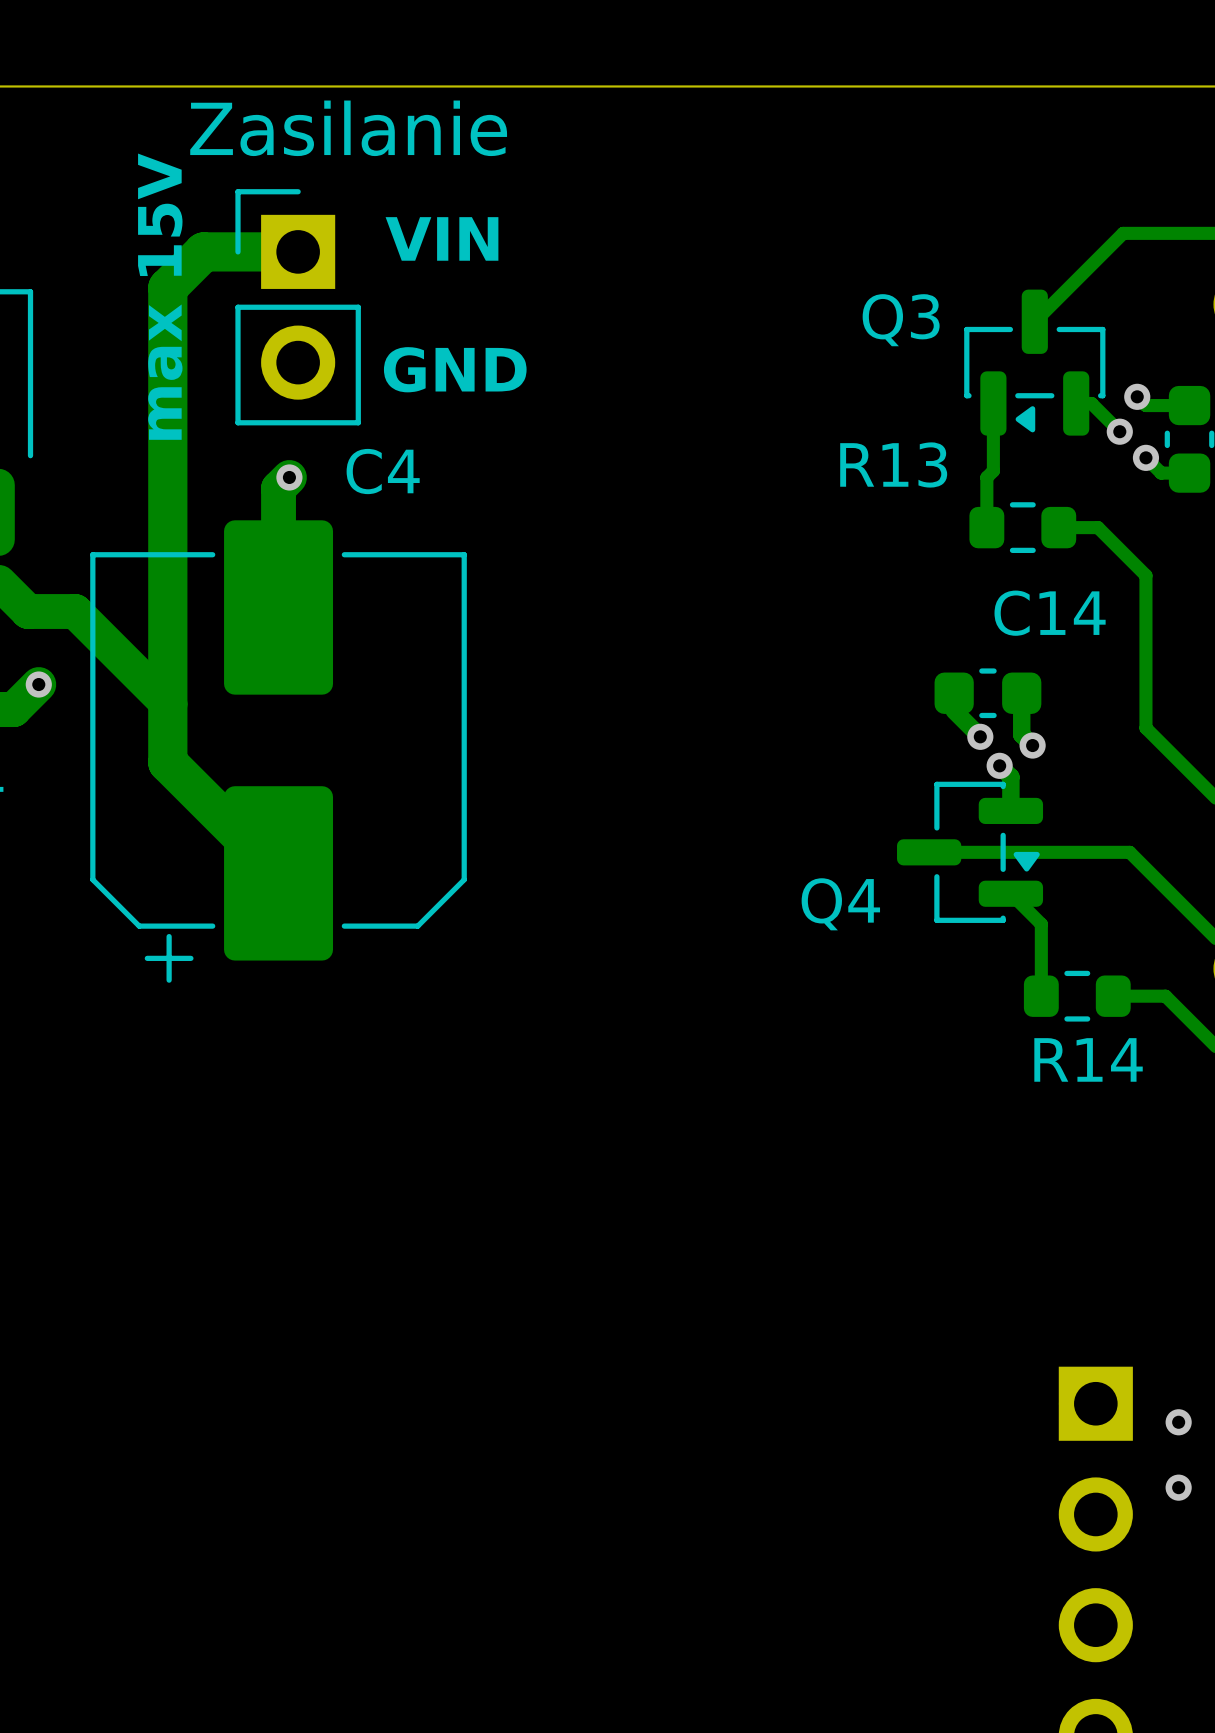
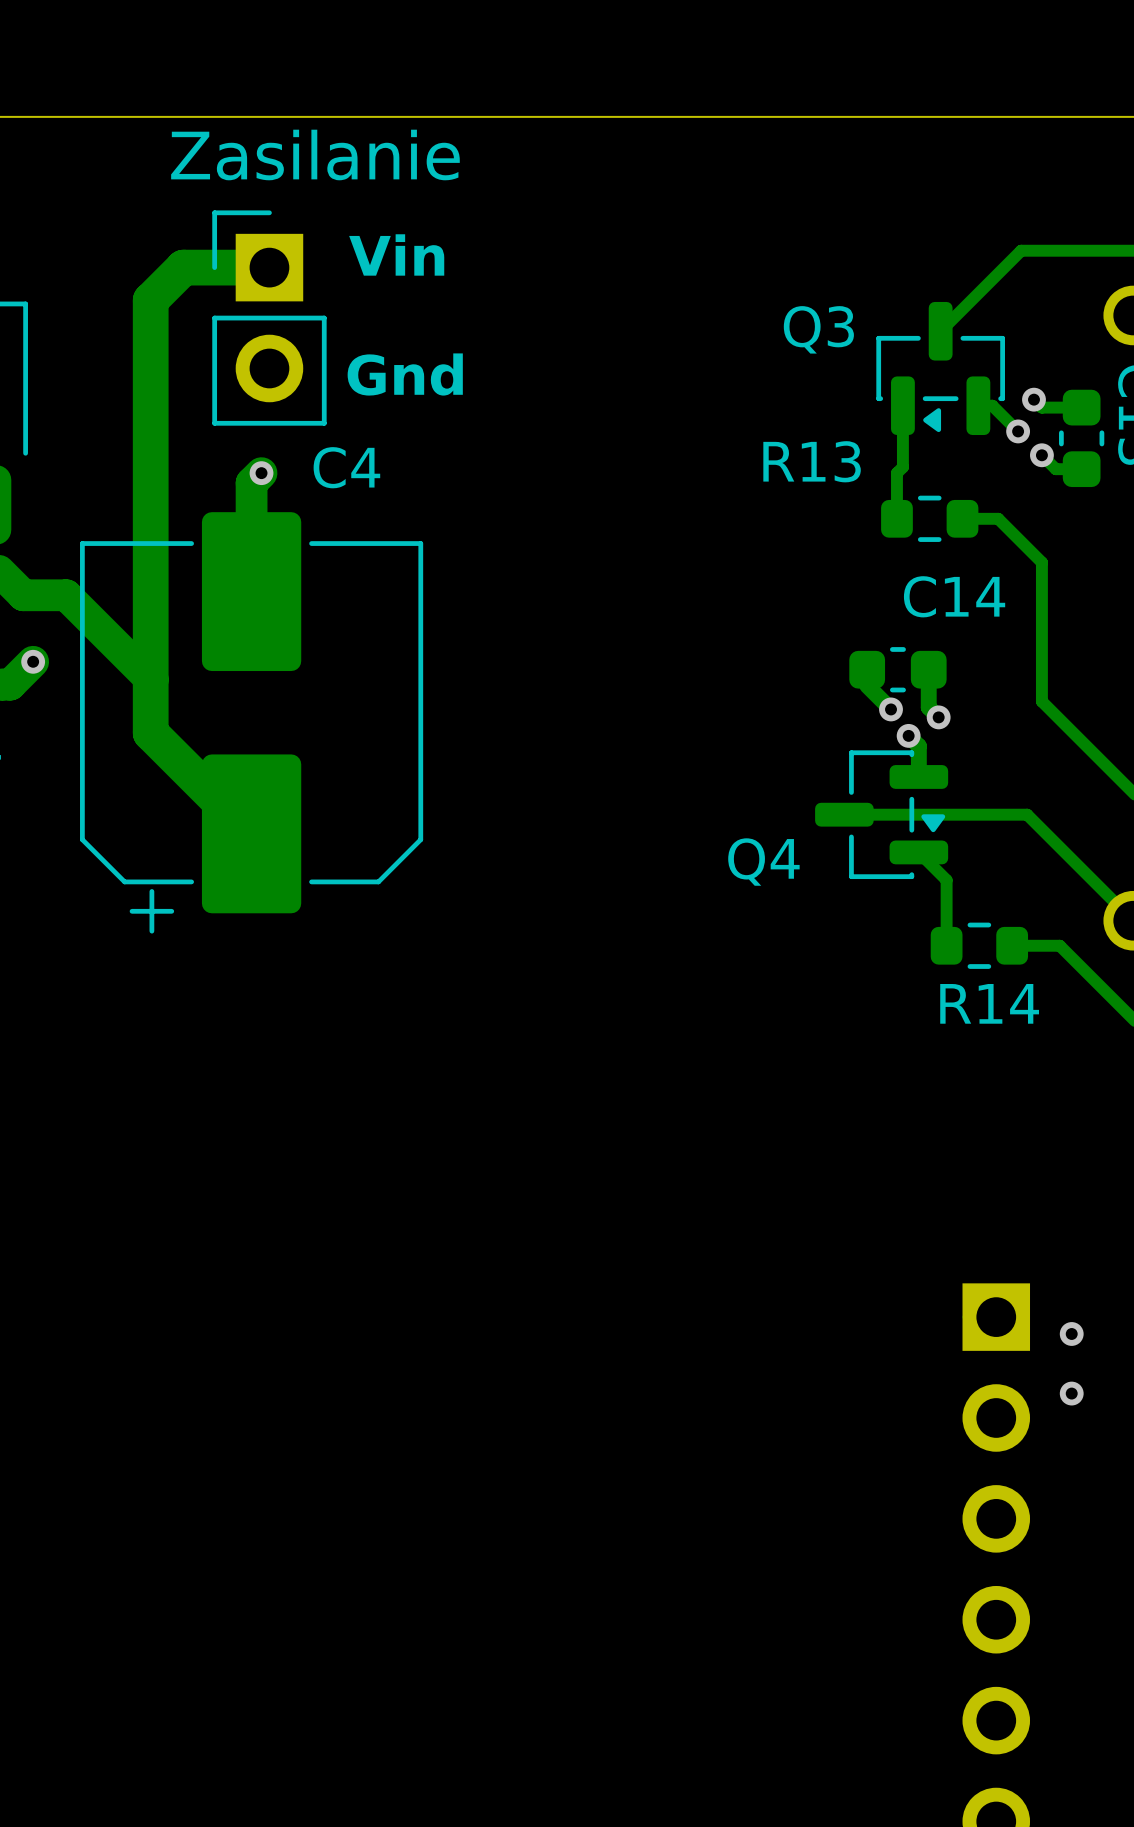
text: VIN (442, 238) -> Vin (396, 254)
text: max 15V (160, 296) -> none
text: GND (455, 369) -> Gnd (405, 374)

